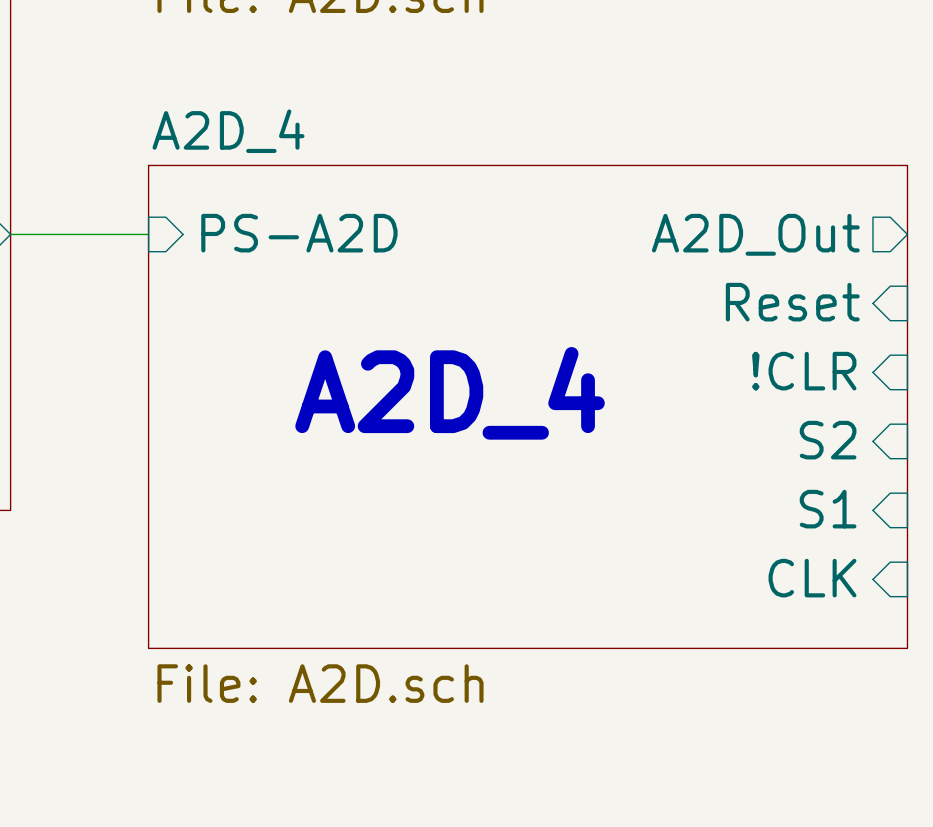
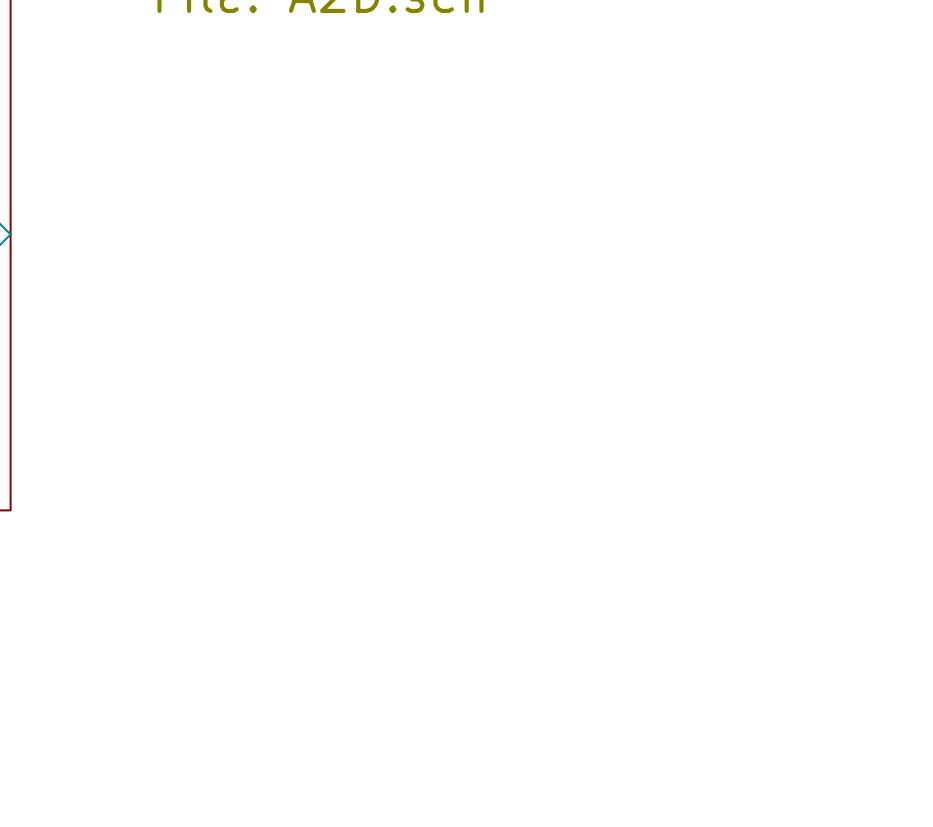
sheet pin: PS-A2D (299, 233) -> none
wire: (10, 234) (148, 234) -> none
sheet pin: A2D_Out (755, 234) -> none
sheet pin: Reset (792, 302) -> none
sheet pin: !CLR (804, 371) -> none
text: A2D_4 (450, 393) -> none
sheet A2D_4: File: A2D.sch (528, 406) -> none
sheet pin: S2 (828, 440) -> none
sheet pin: S1 (828, 509) -> none
sheet pin: CLK (812, 578) -> none

